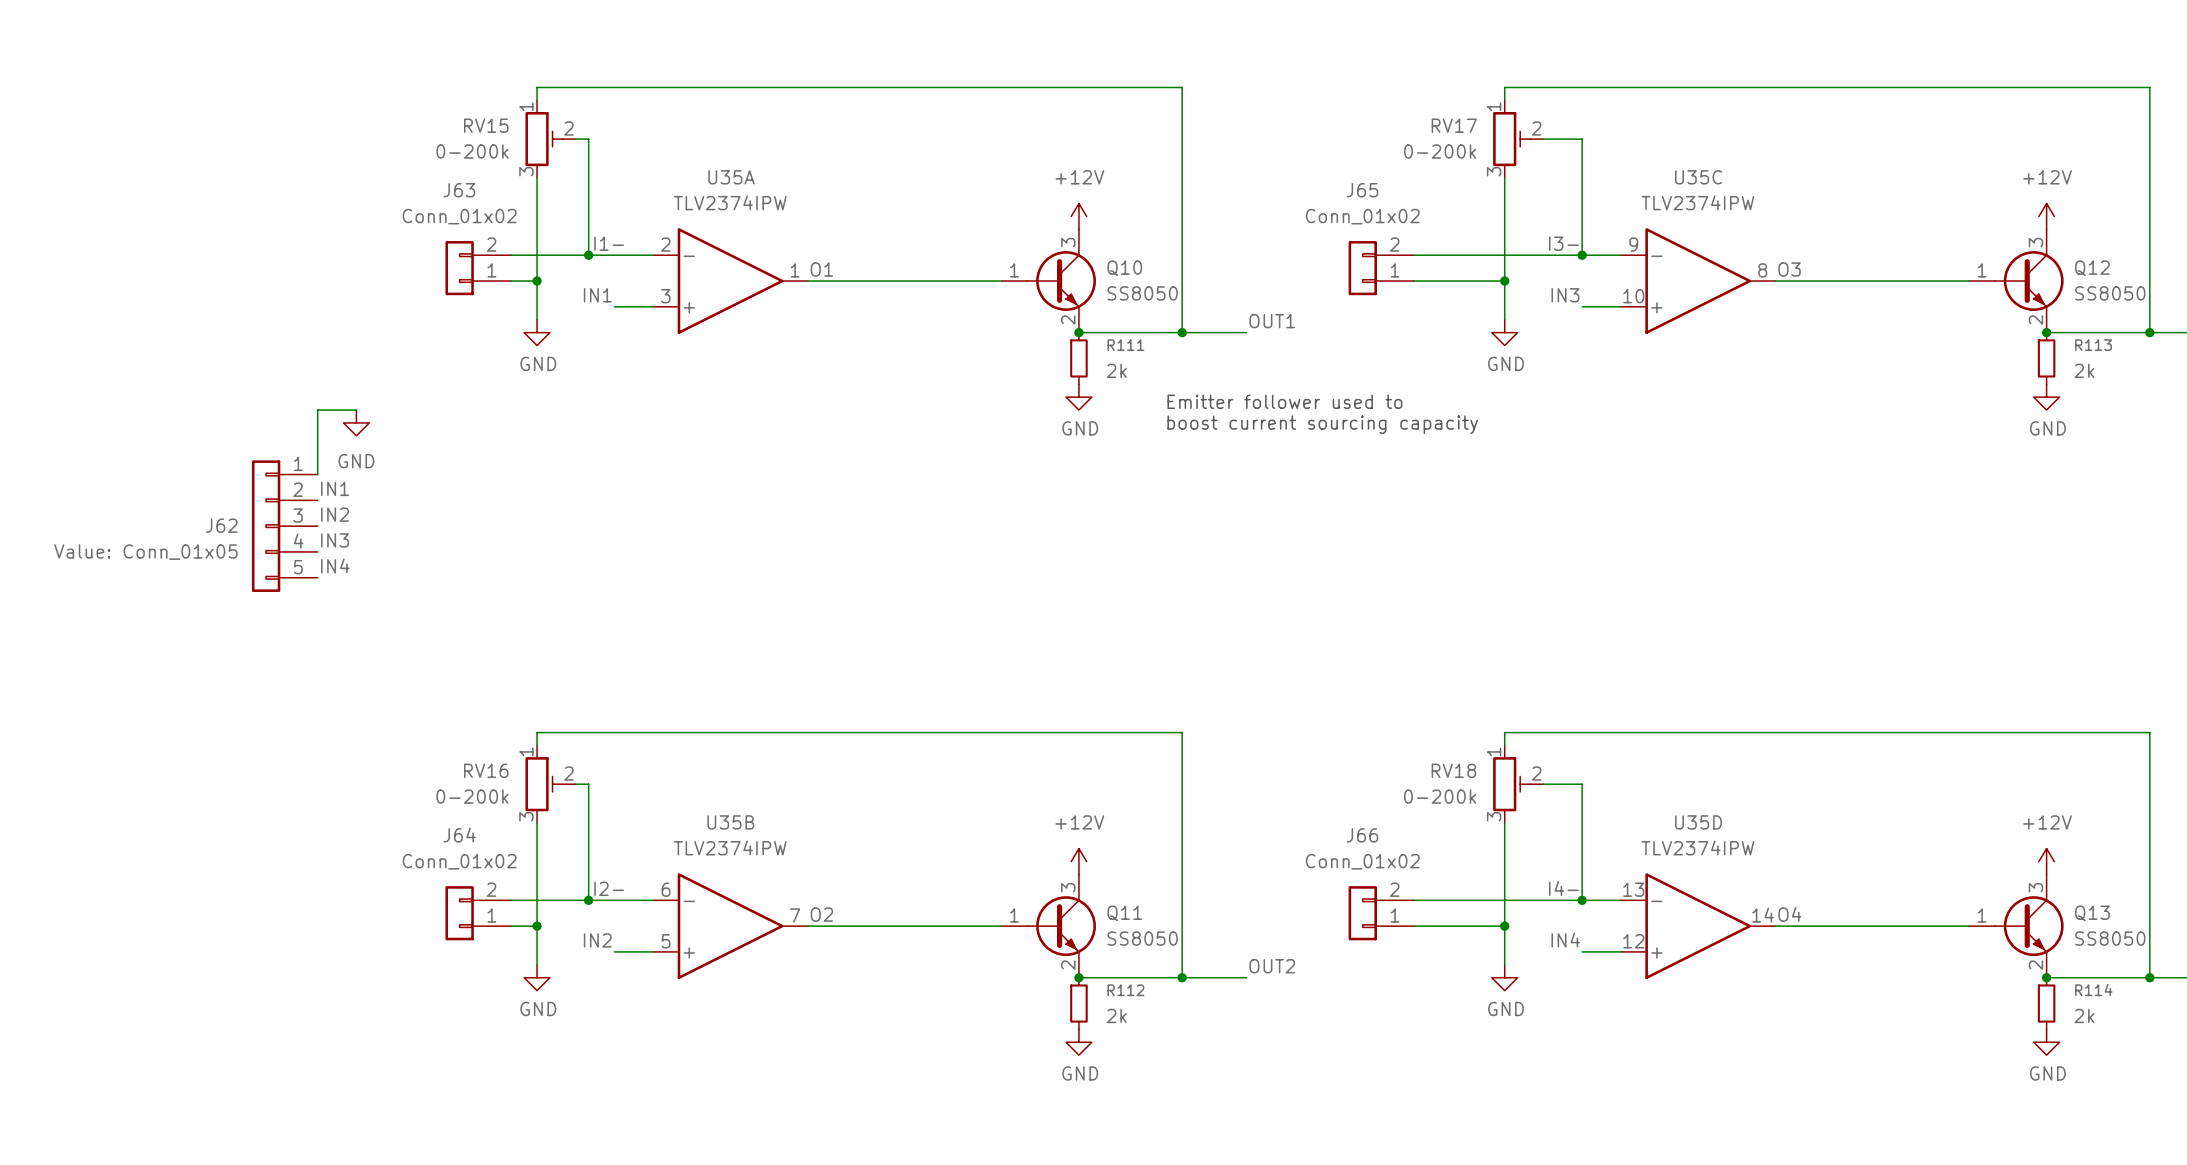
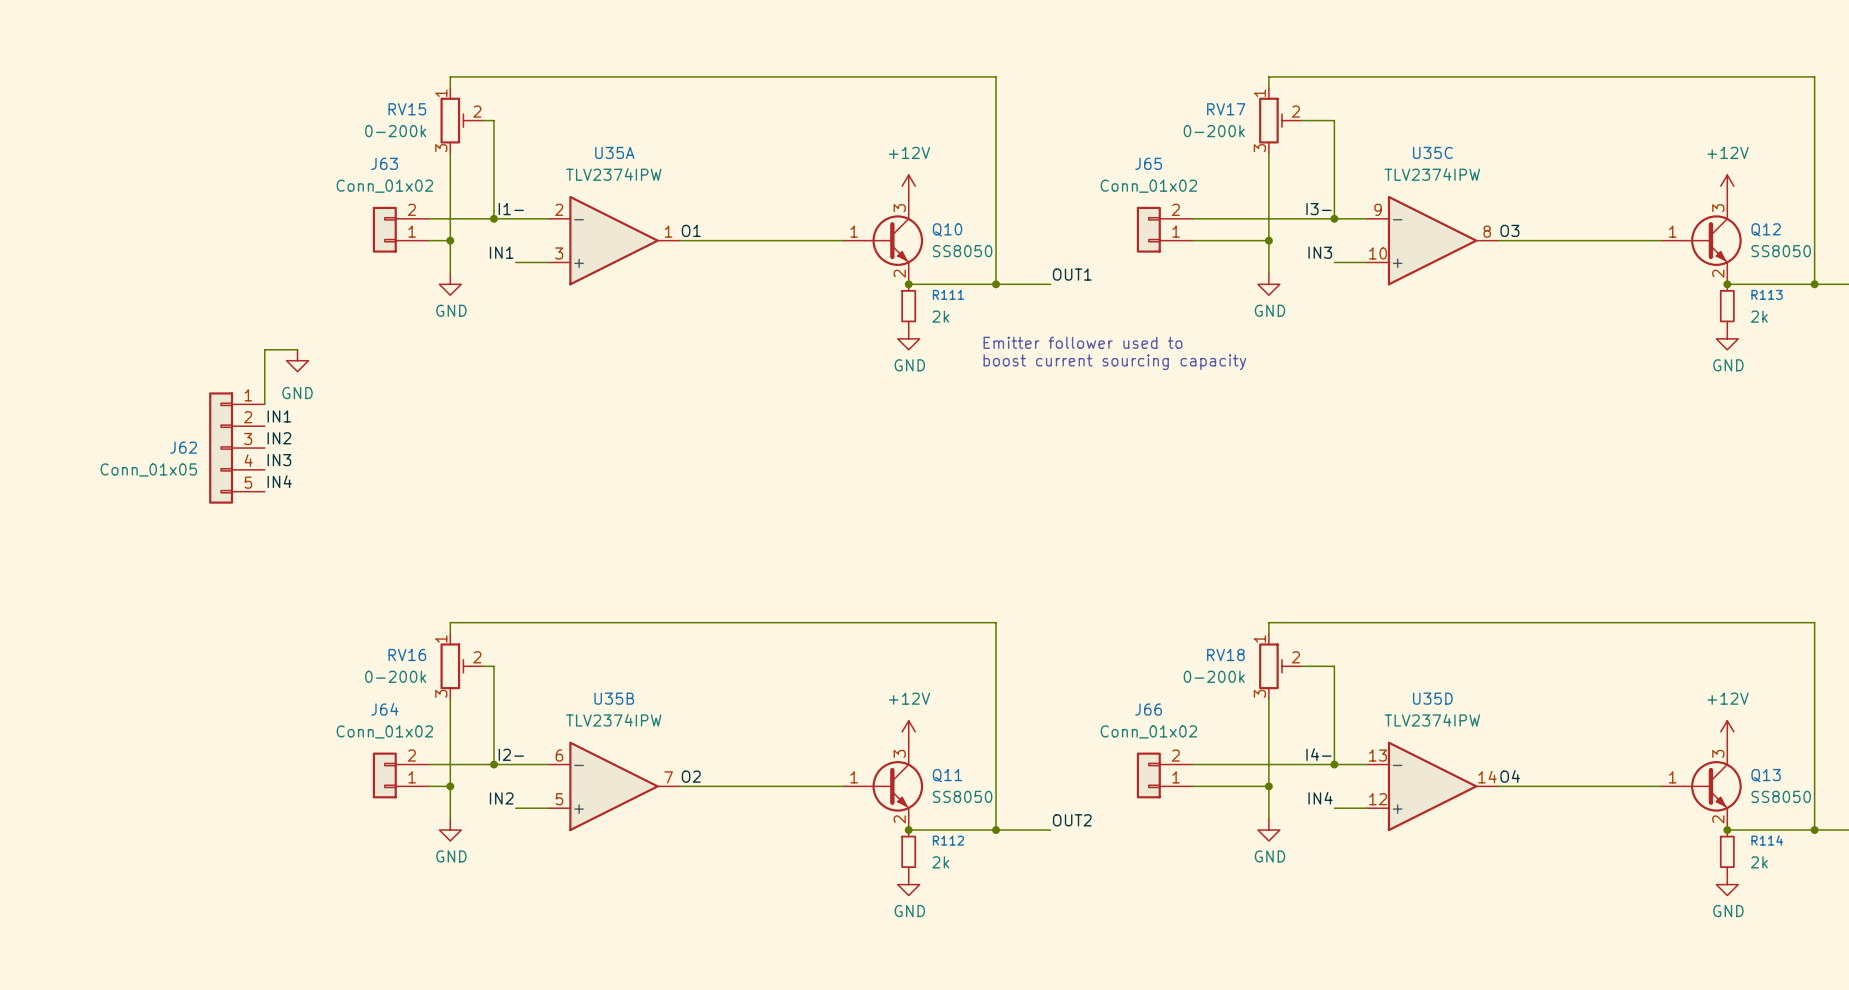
J62 value: Value: Conn_01x05 (145, 552) -> Conn_01x05 (148, 469)

